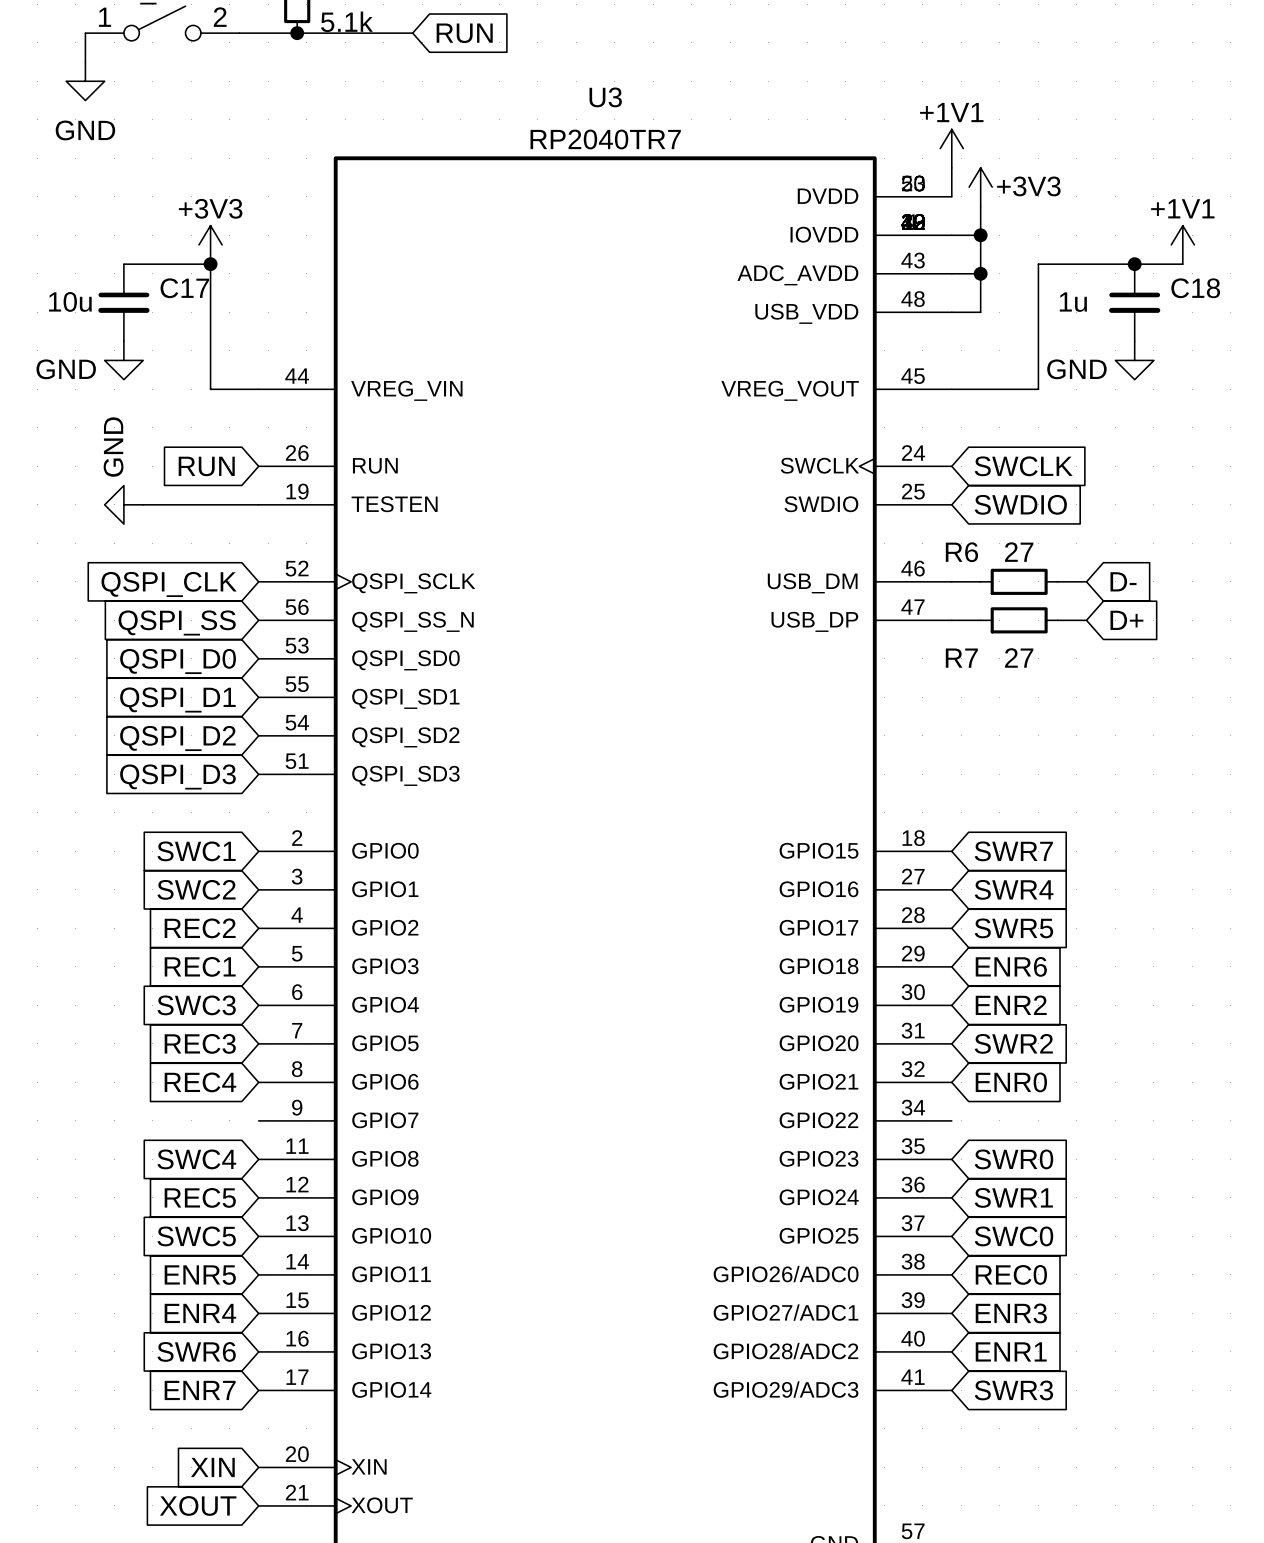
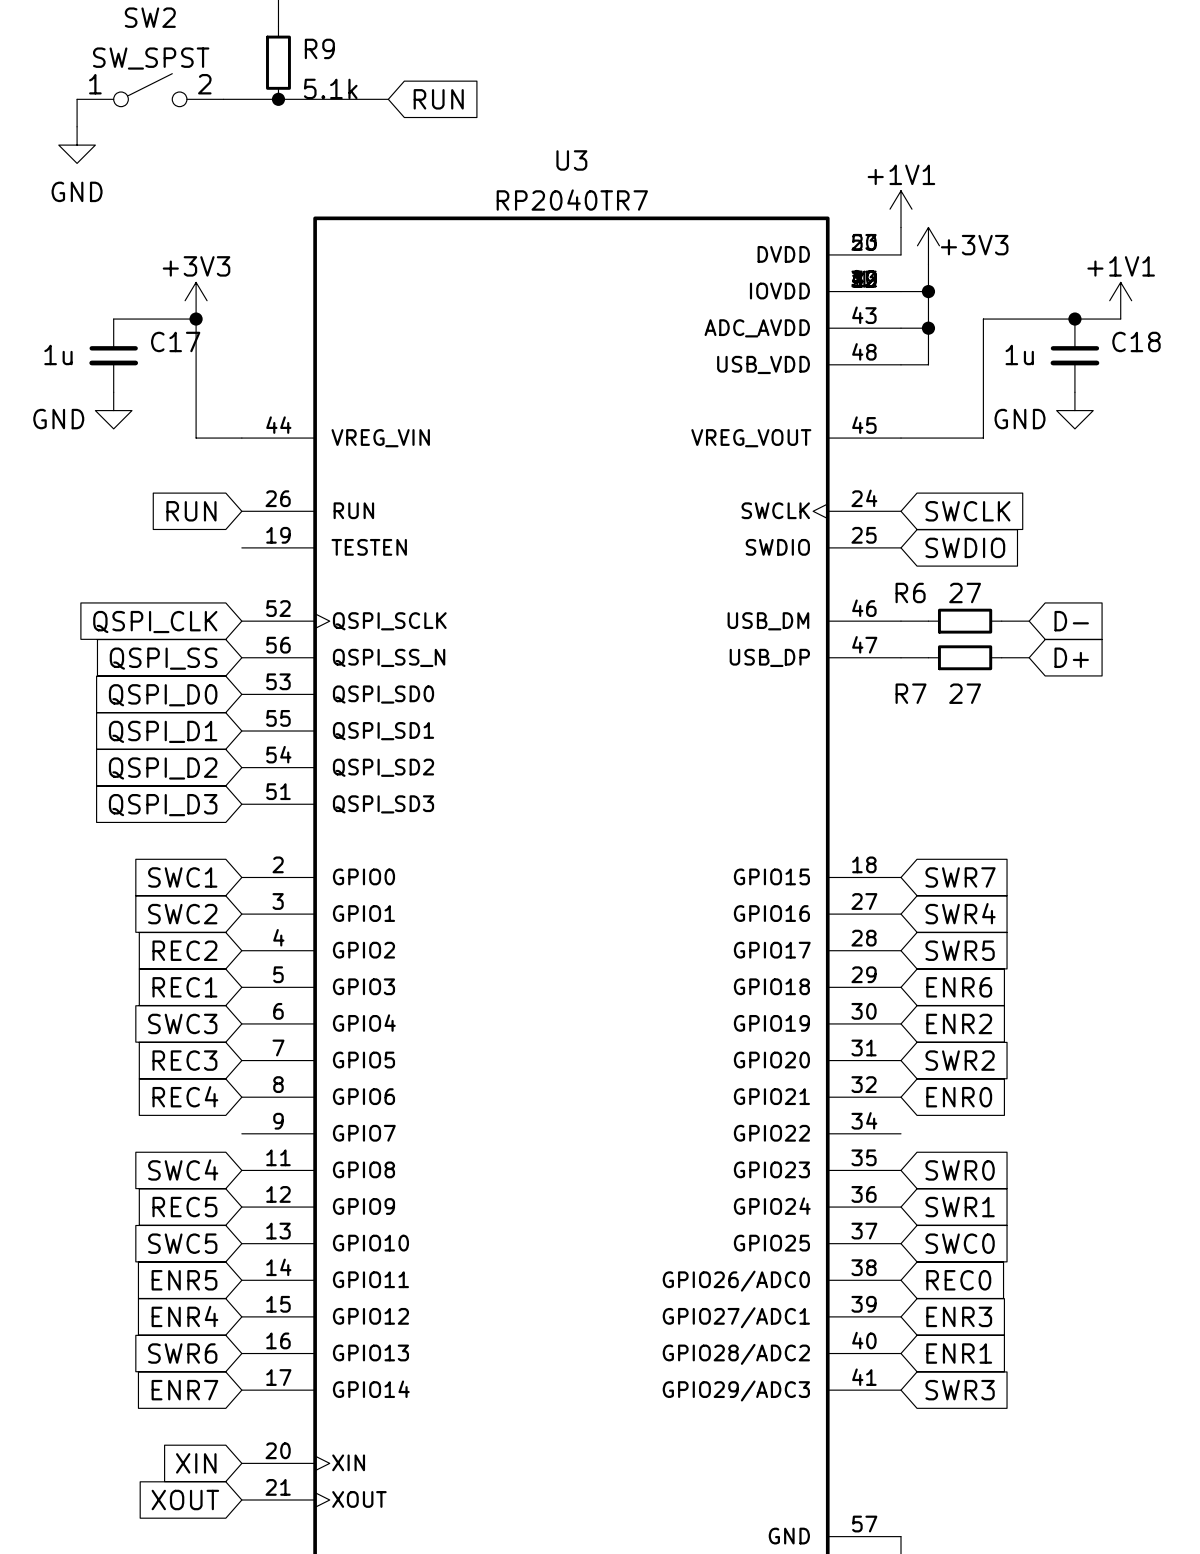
C17 value: 10u (70, 301) -> 1u (58, 354)
power symbol: GND (123, 504) -> none
wire: (143, 504) (258, 504) -> none

